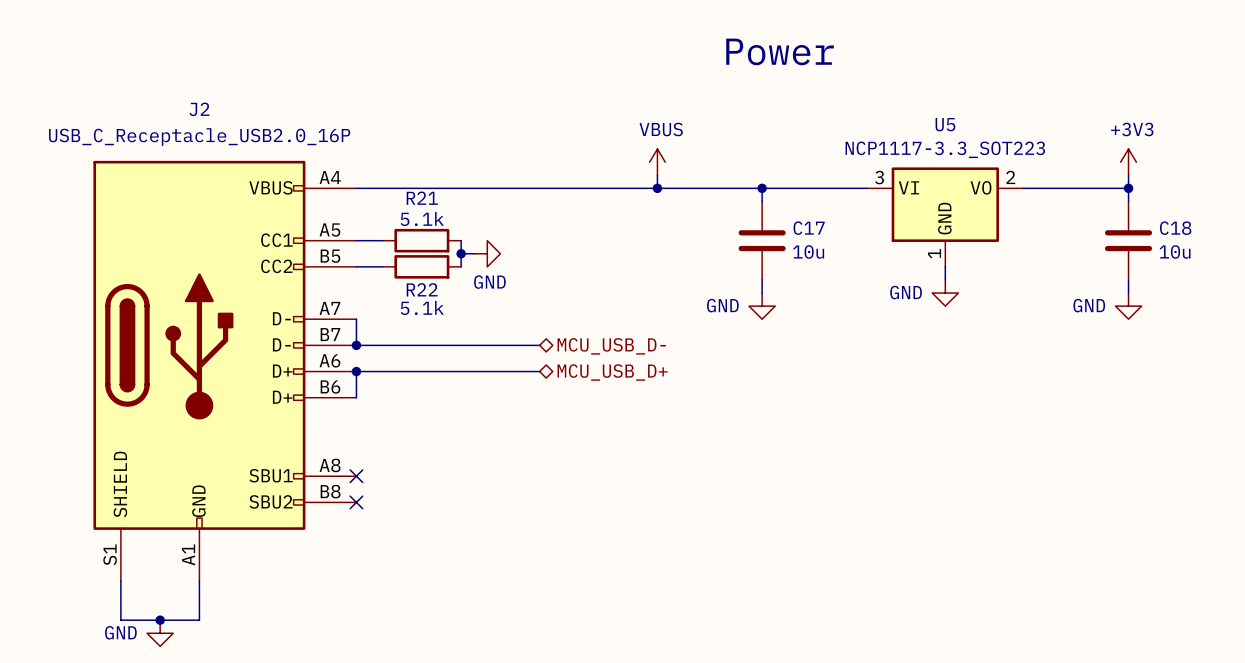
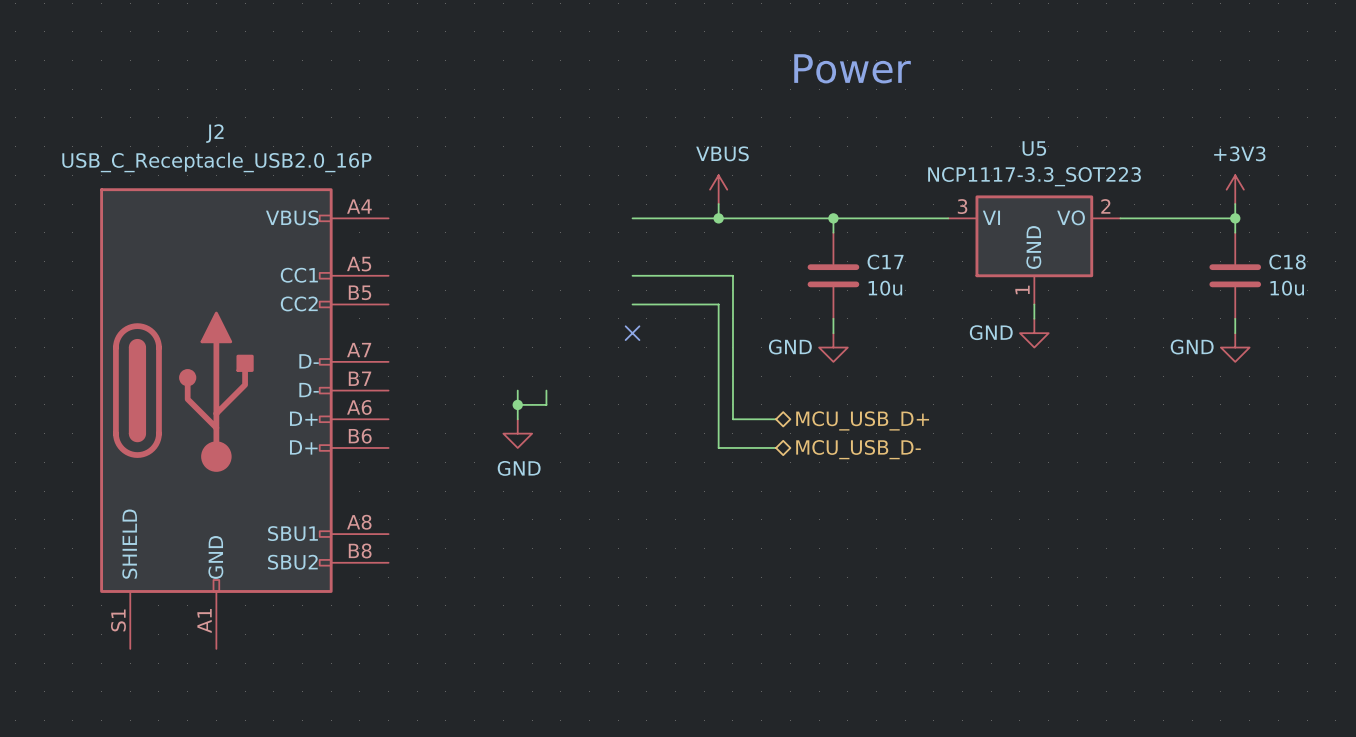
wire: (356, 188) (578, 188) -> none
wire: (356, 240) (382, 240) -> none
R21: 5.1k (421, 240) -> none
wire: (461, 240) (461, 266) -> (517, 390) (517, 419)
wire: none -> (632, 275) (732, 275) (732, 419) (776, 419)
wire: (461, 253) (474, 253) -> none
junction: (461, 253) -> none
power symbol rotation: 0° (487, 253) -> 90° clockwise (517, 433)
power symbol position: GND (487, 253) -> GND (517, 433)
wire: (356, 266) (382, 266) -> none
R22: 5.1k (421, 266) -> none
wire: none -> (632, 304) (718, 304) (718, 447) (776, 447)
no-connect mark: none -> (632, 333)
wire: (356, 319) (356, 345) (539, 345) -> none
junction: (356, 345) -> none
wire: none -> (546, 390) (546, 404) (517, 404)
hierarchical label position: MCU_USB_D- (611, 346) -> MCU_USB_D- (858, 449)
junction: none -> (517, 404)
junction: (356, 371) -> none
wire: (539, 371) (356, 371) (356, 397) -> none
hierarchical label position: MCU_USB_D+ (612, 372) -> MCU_USB_D+ (862, 420)
no-connect mark: (356, 476) -> none
no-connect mark: (356, 502) -> none
wire: (120, 580) (120, 620) (199, 620) (199, 580) -> none
junction: (160, 620) -> none
power symbol: GND (160, 633) -> none

